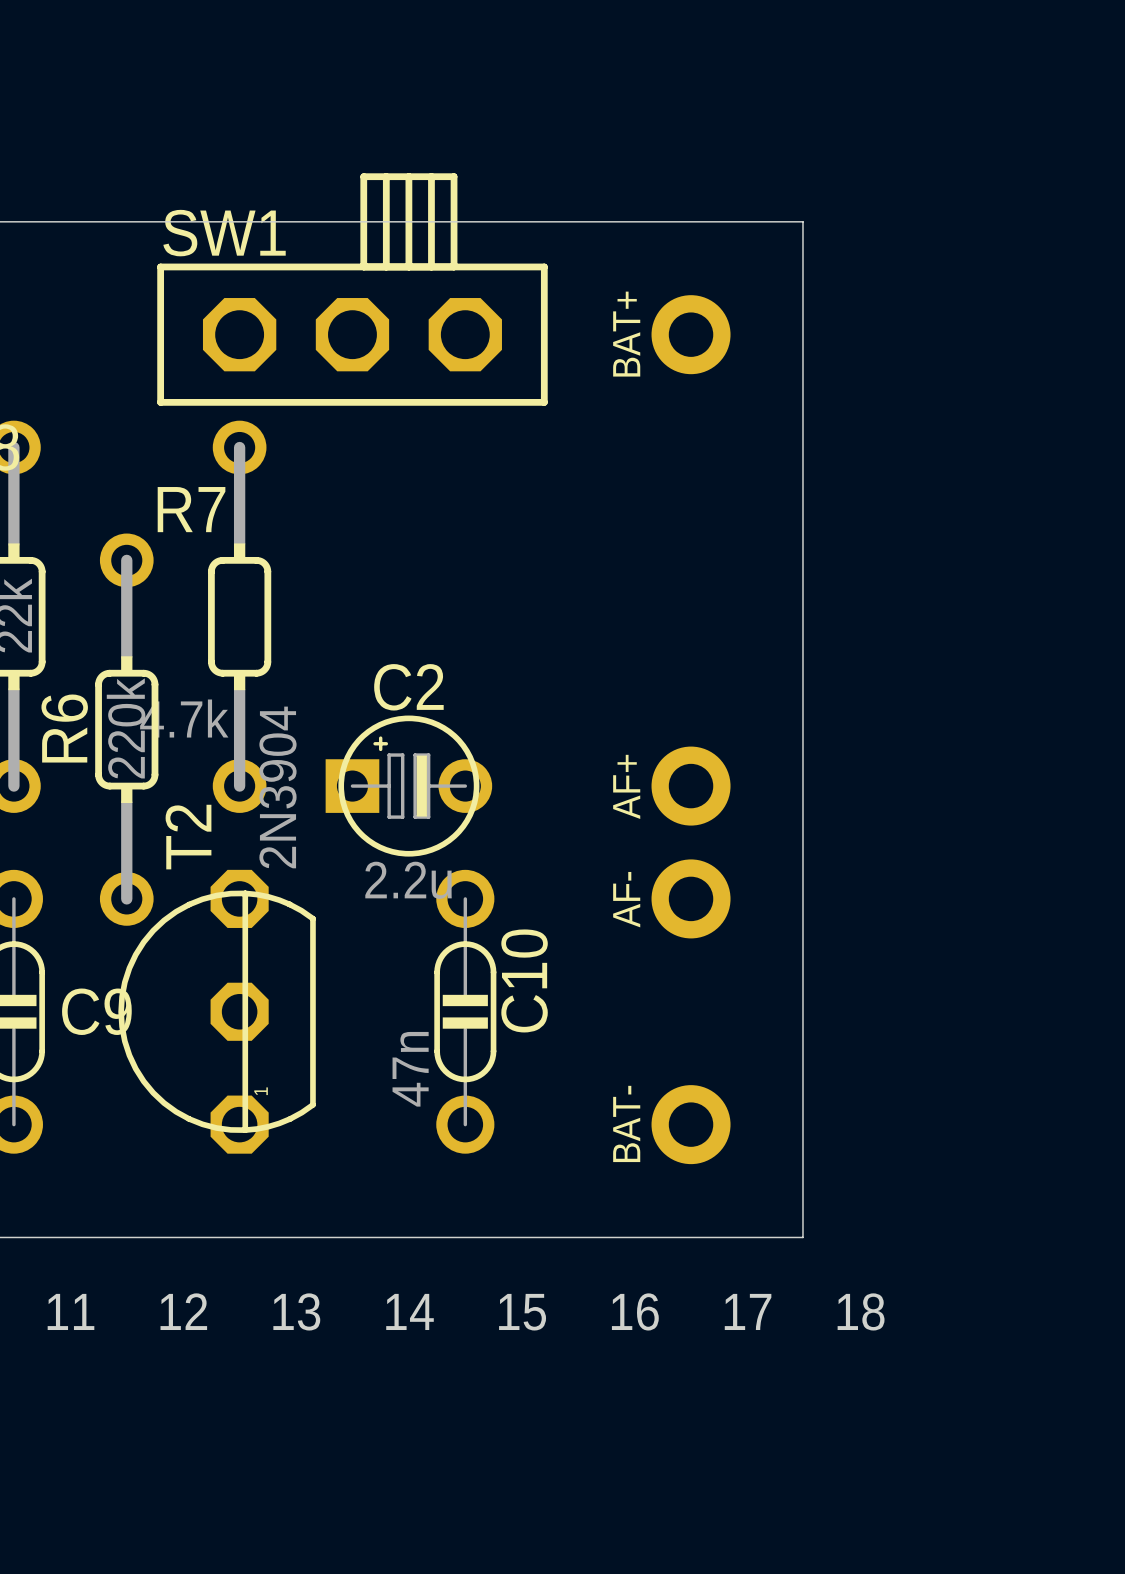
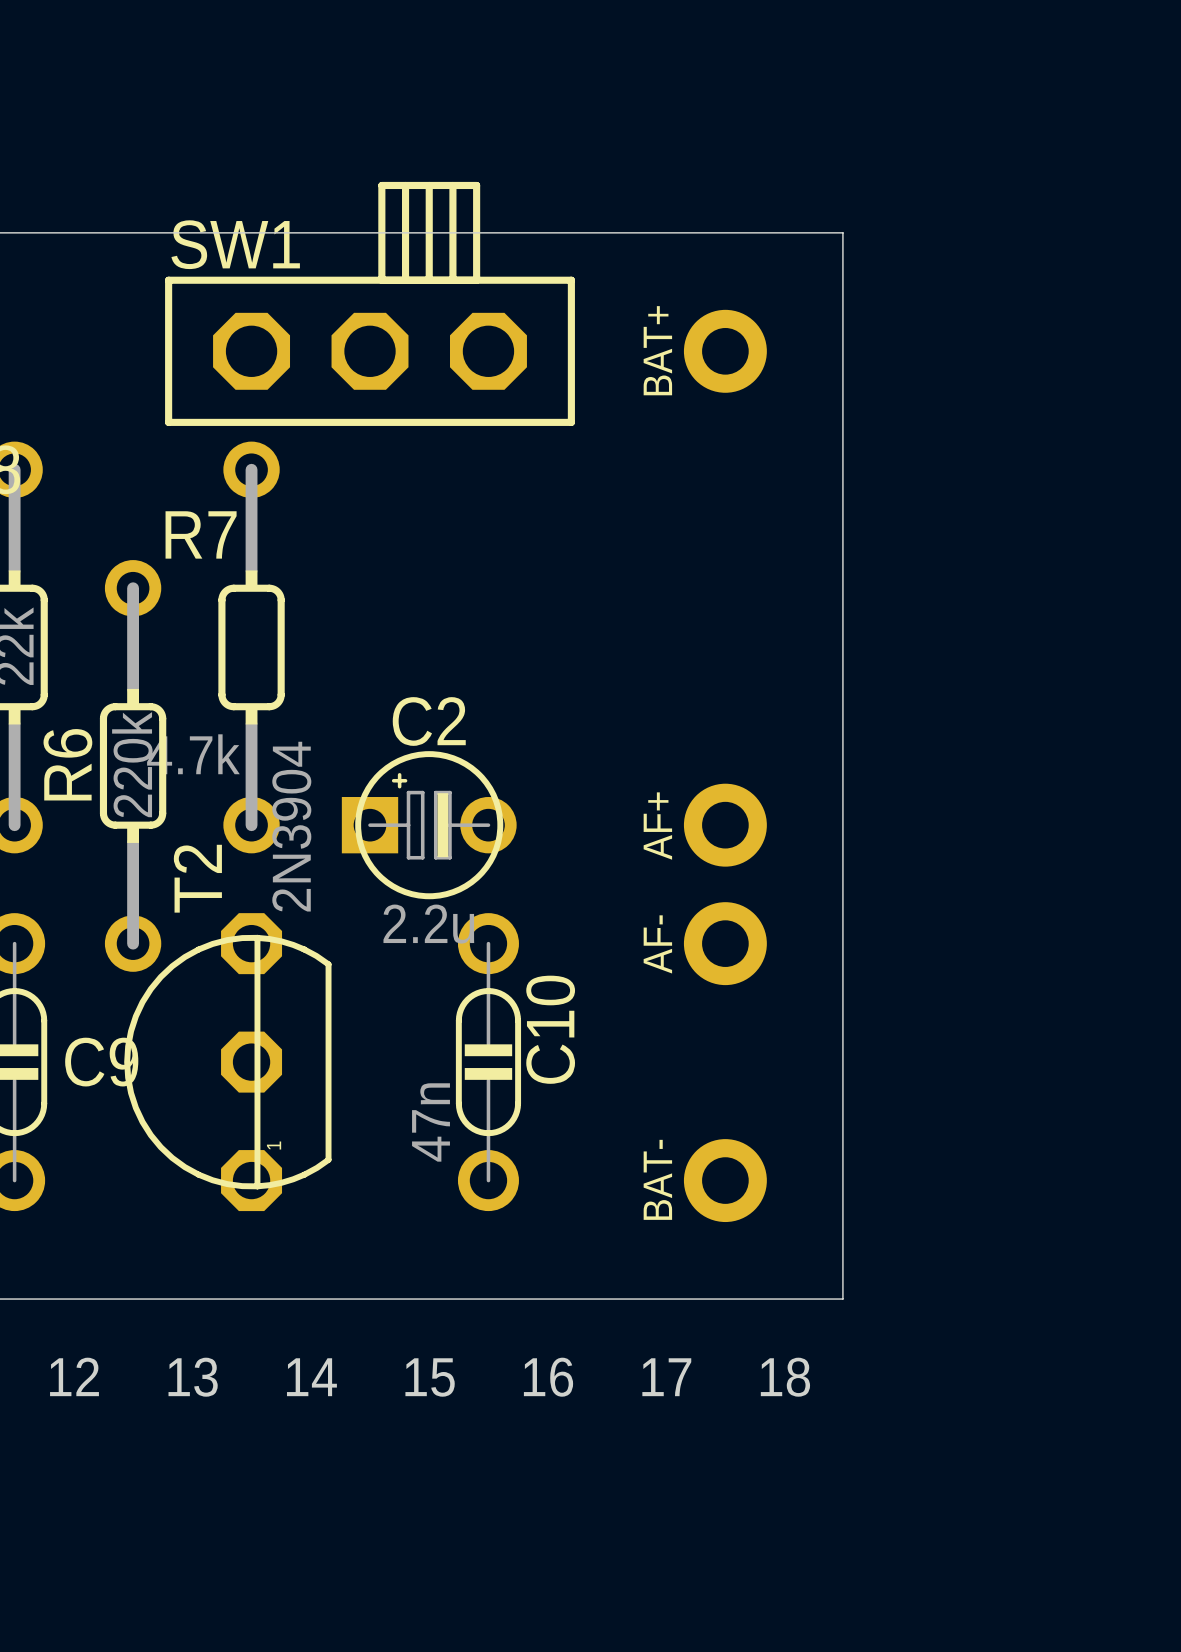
text: 11 (70, 1311) -> 12 (74, 1376)
text: 12 (183, 1311) -> 13 (193, 1377)
text: 13 (296, 1311) -> 14 (311, 1377)
text: 14 (410, 1311) -> 15 (430, 1377)
text: 16 (635, 1311) -> 17 (666, 1377)
text: 17 (748, 1311) -> 18 (785, 1377)
text: 18 (861, 1311) -> none
text: 15 (522, 1312) -> 16 (548, 1377)

